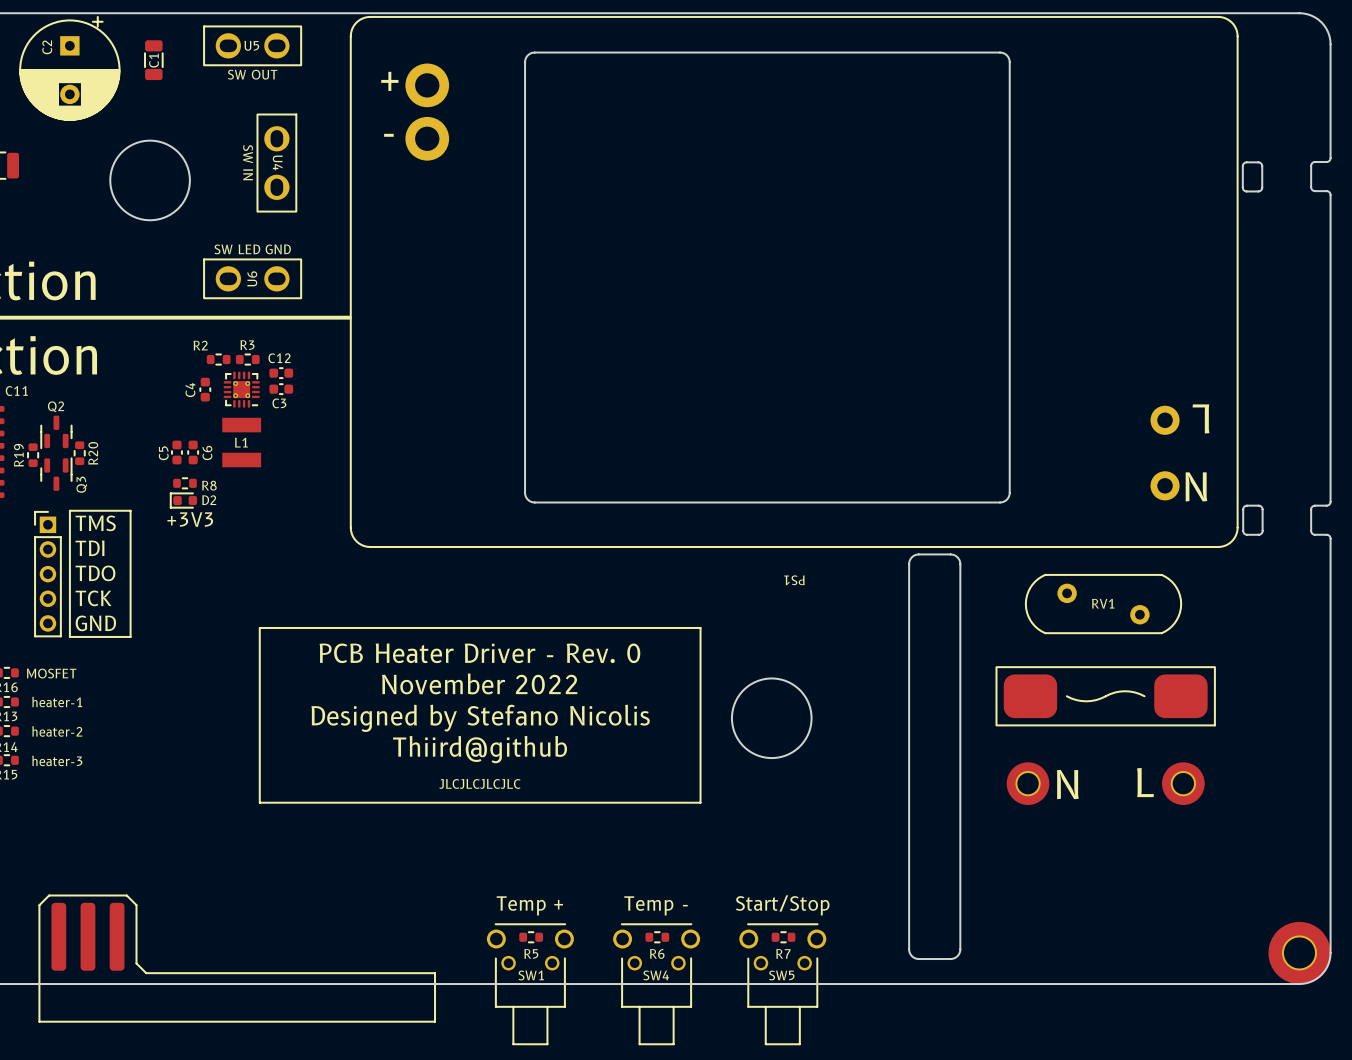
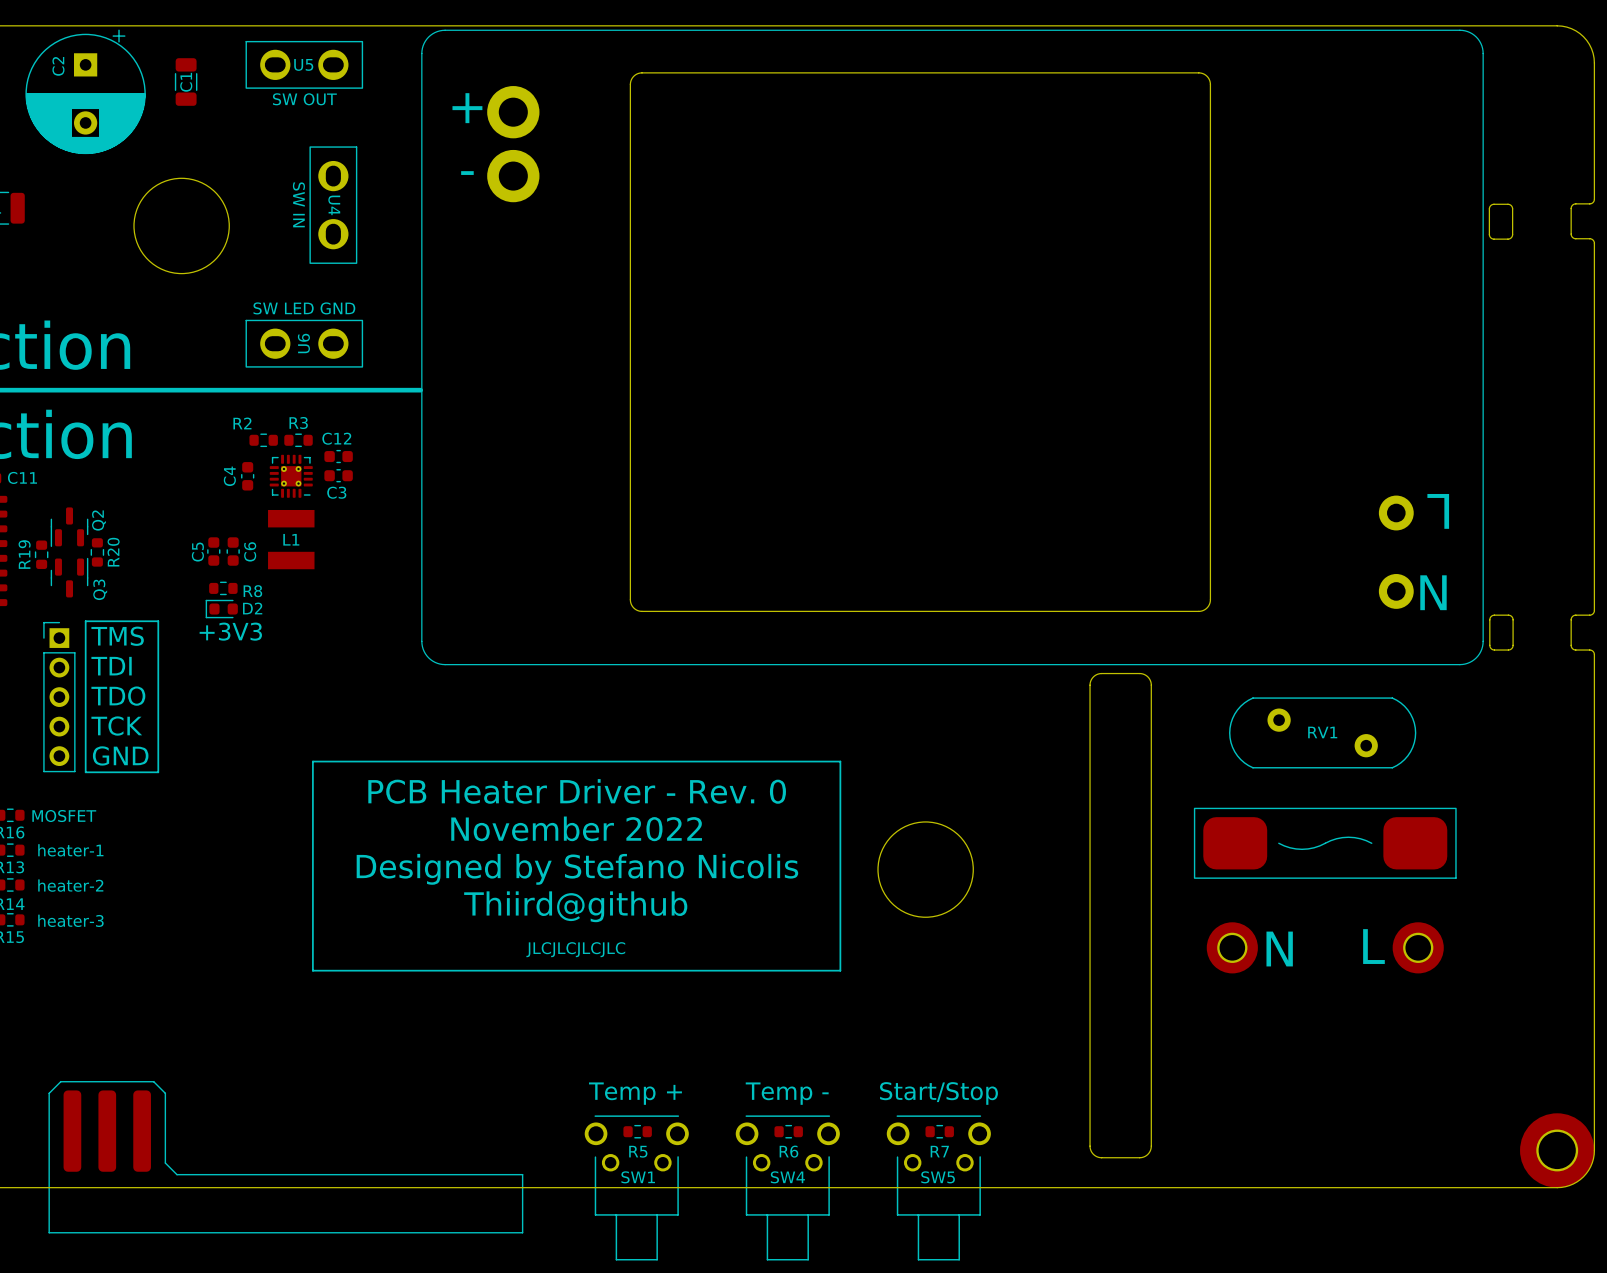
Q2 name rotation: 0° (56, 406) -> 90° counterclockwise (98, 520)
Q2 name position: Q2 (56, 406) -> Q2 (98, 520)
PS1 name: PS1 (794, 580) -> none

